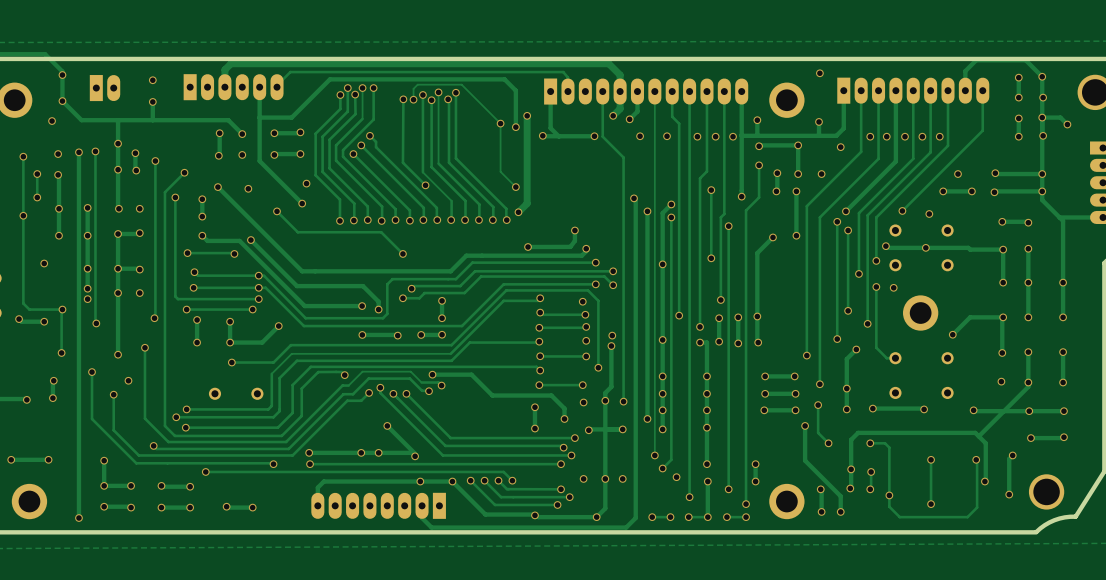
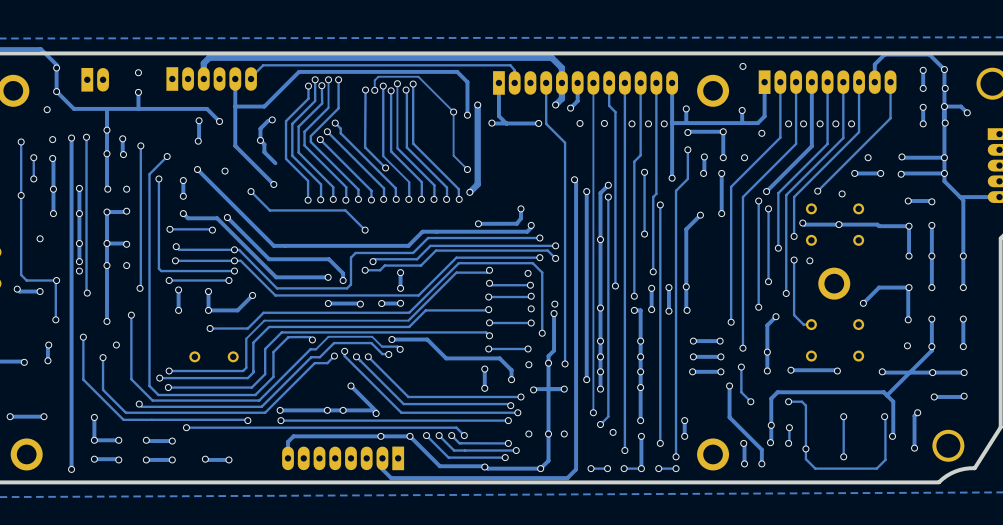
track: (300, 132) (274, 133) -> none
via: (274, 133) -> none
track: none -> (268, 120) (260, 128) (260, 140) (264, 144) (264, 152) (275, 163)
via: (242, 154) -> none
via: (274, 154) -> none
via: none -> (260, 140)
track: (300, 154) (274, 154) -> none
via: (300, 154) -> none
via: (306, 183) -> none

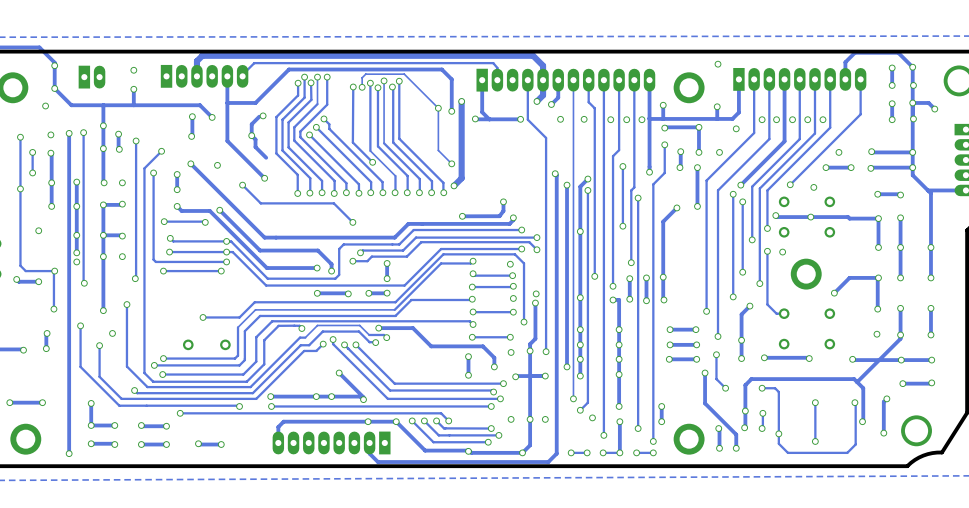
track: (178, 289) (178, 310) -> none
via: (178, 289) -> none
track: (208, 291) (208, 310) (237, 310) (252, 295) -> none
via: (208, 291) -> none
via: (252, 295) -> none
via: (178, 310) -> none
via: (208, 310) -> none

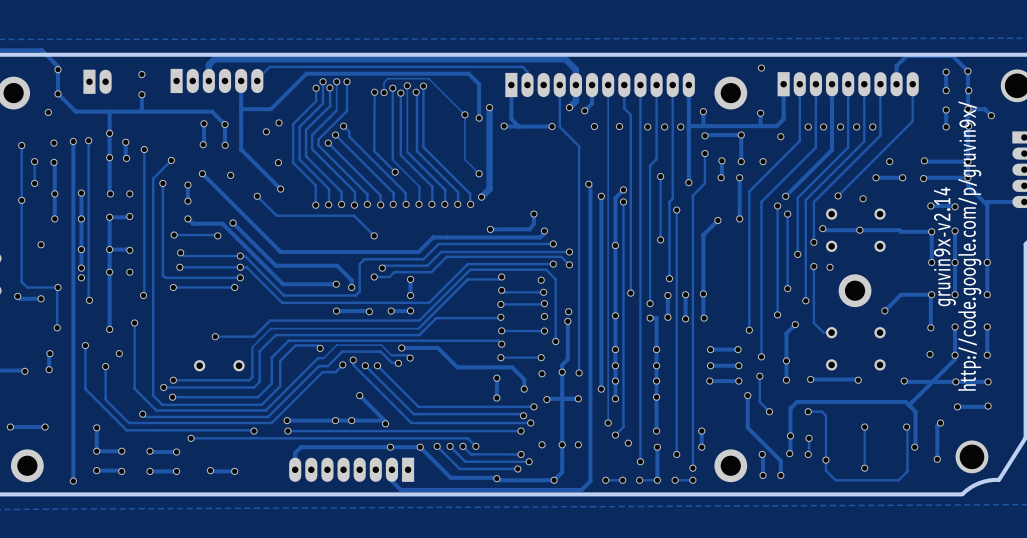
track: (259, 116) (251, 124) (251, 135) (255, 139) (255, 147) (266, 157) -> none
track: none -> (225, 124) (225, 145)
via: none -> (266, 131)
via: (251, 135) -> none
via: none -> (225, 145)
via: none -> (278, 162)
text: none -> http://code.google.com/p/gruvin9x/ (969, 246)
text: none -> gruvin9x-v2.14 (944, 246)

